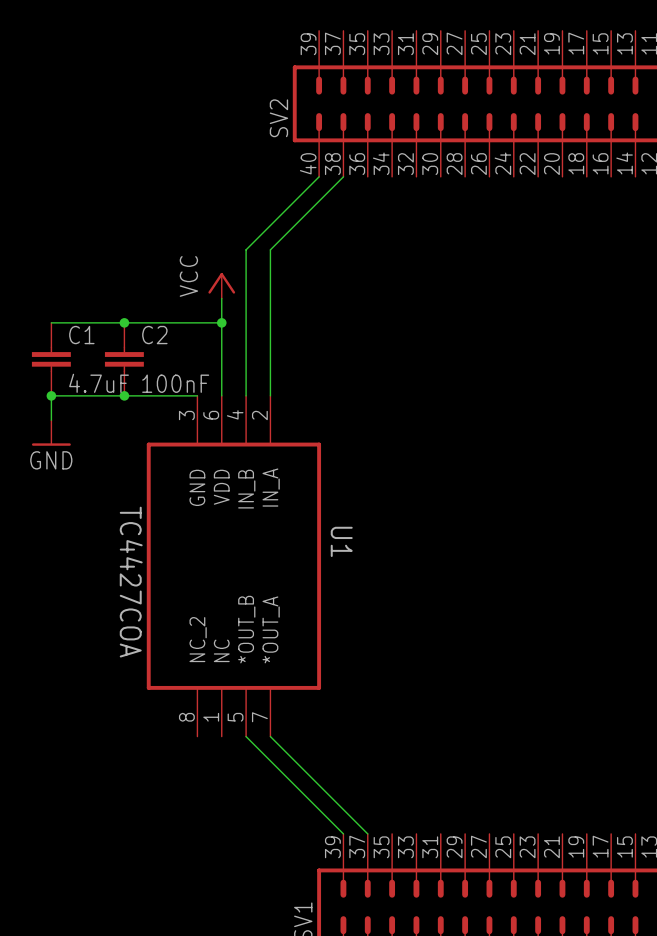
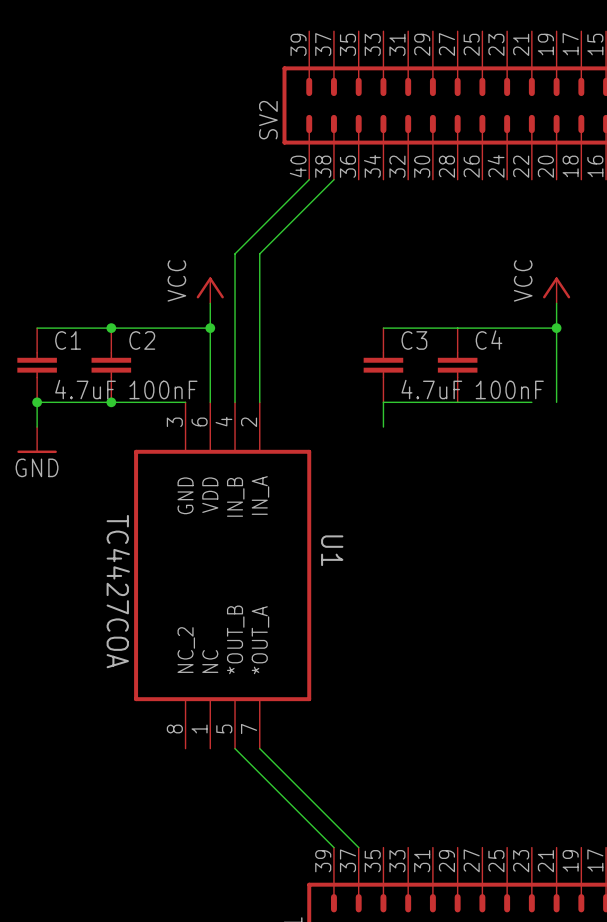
power symbol: none -> VCC (556, 290)
wire: none -> (556, 303) (556, 402)
wire: none -> (383, 328) (556, 328)
junction: none -> (556, 328)
C3: none -> 4.7uF (383, 365)
C4: none -> 100nF (457, 365)
wire: none -> (531, 402) (383, 402) (383, 427)

